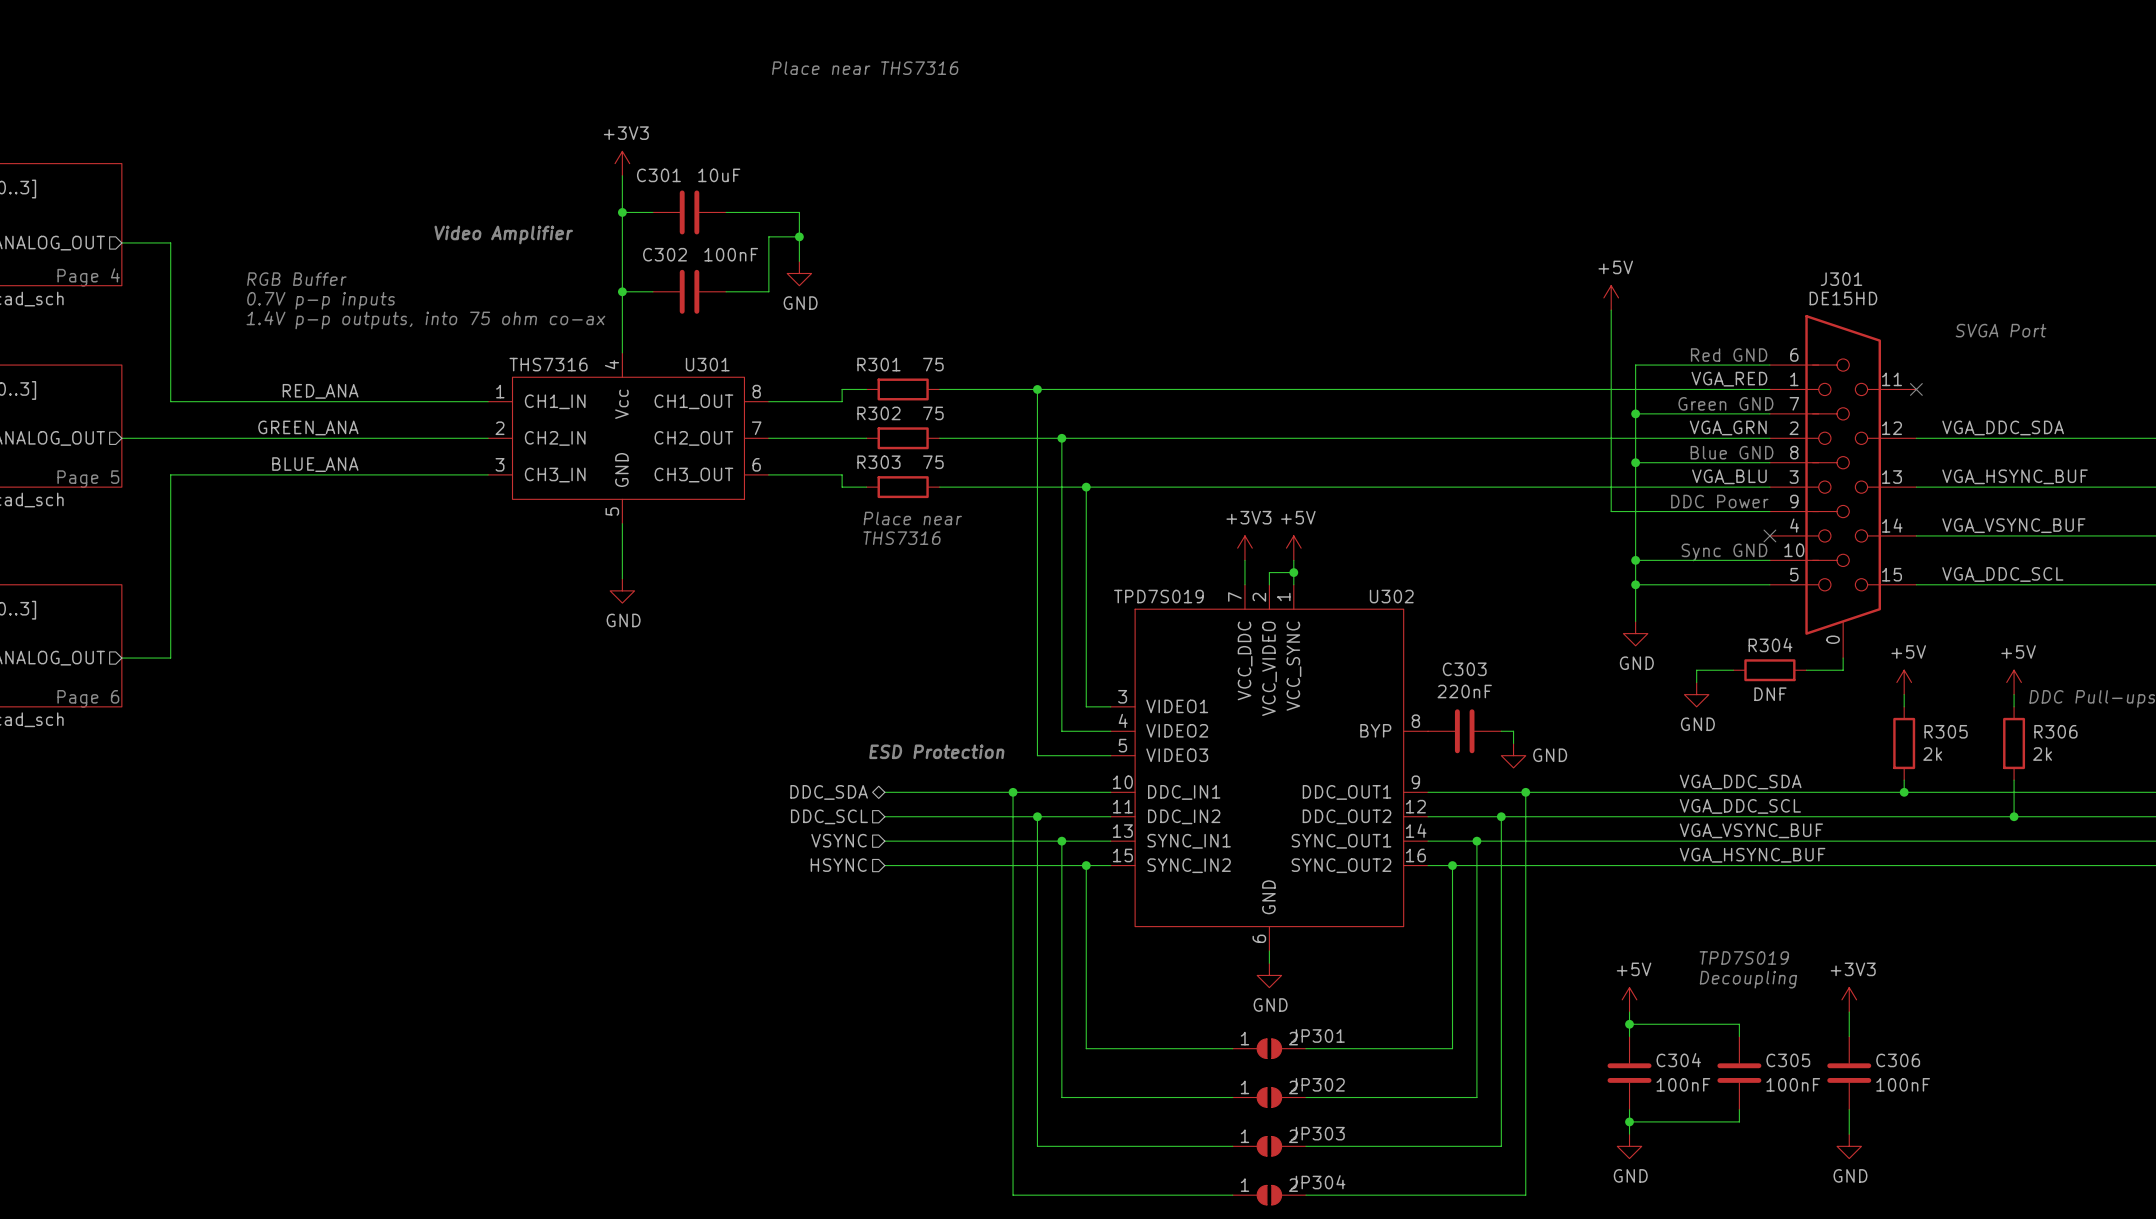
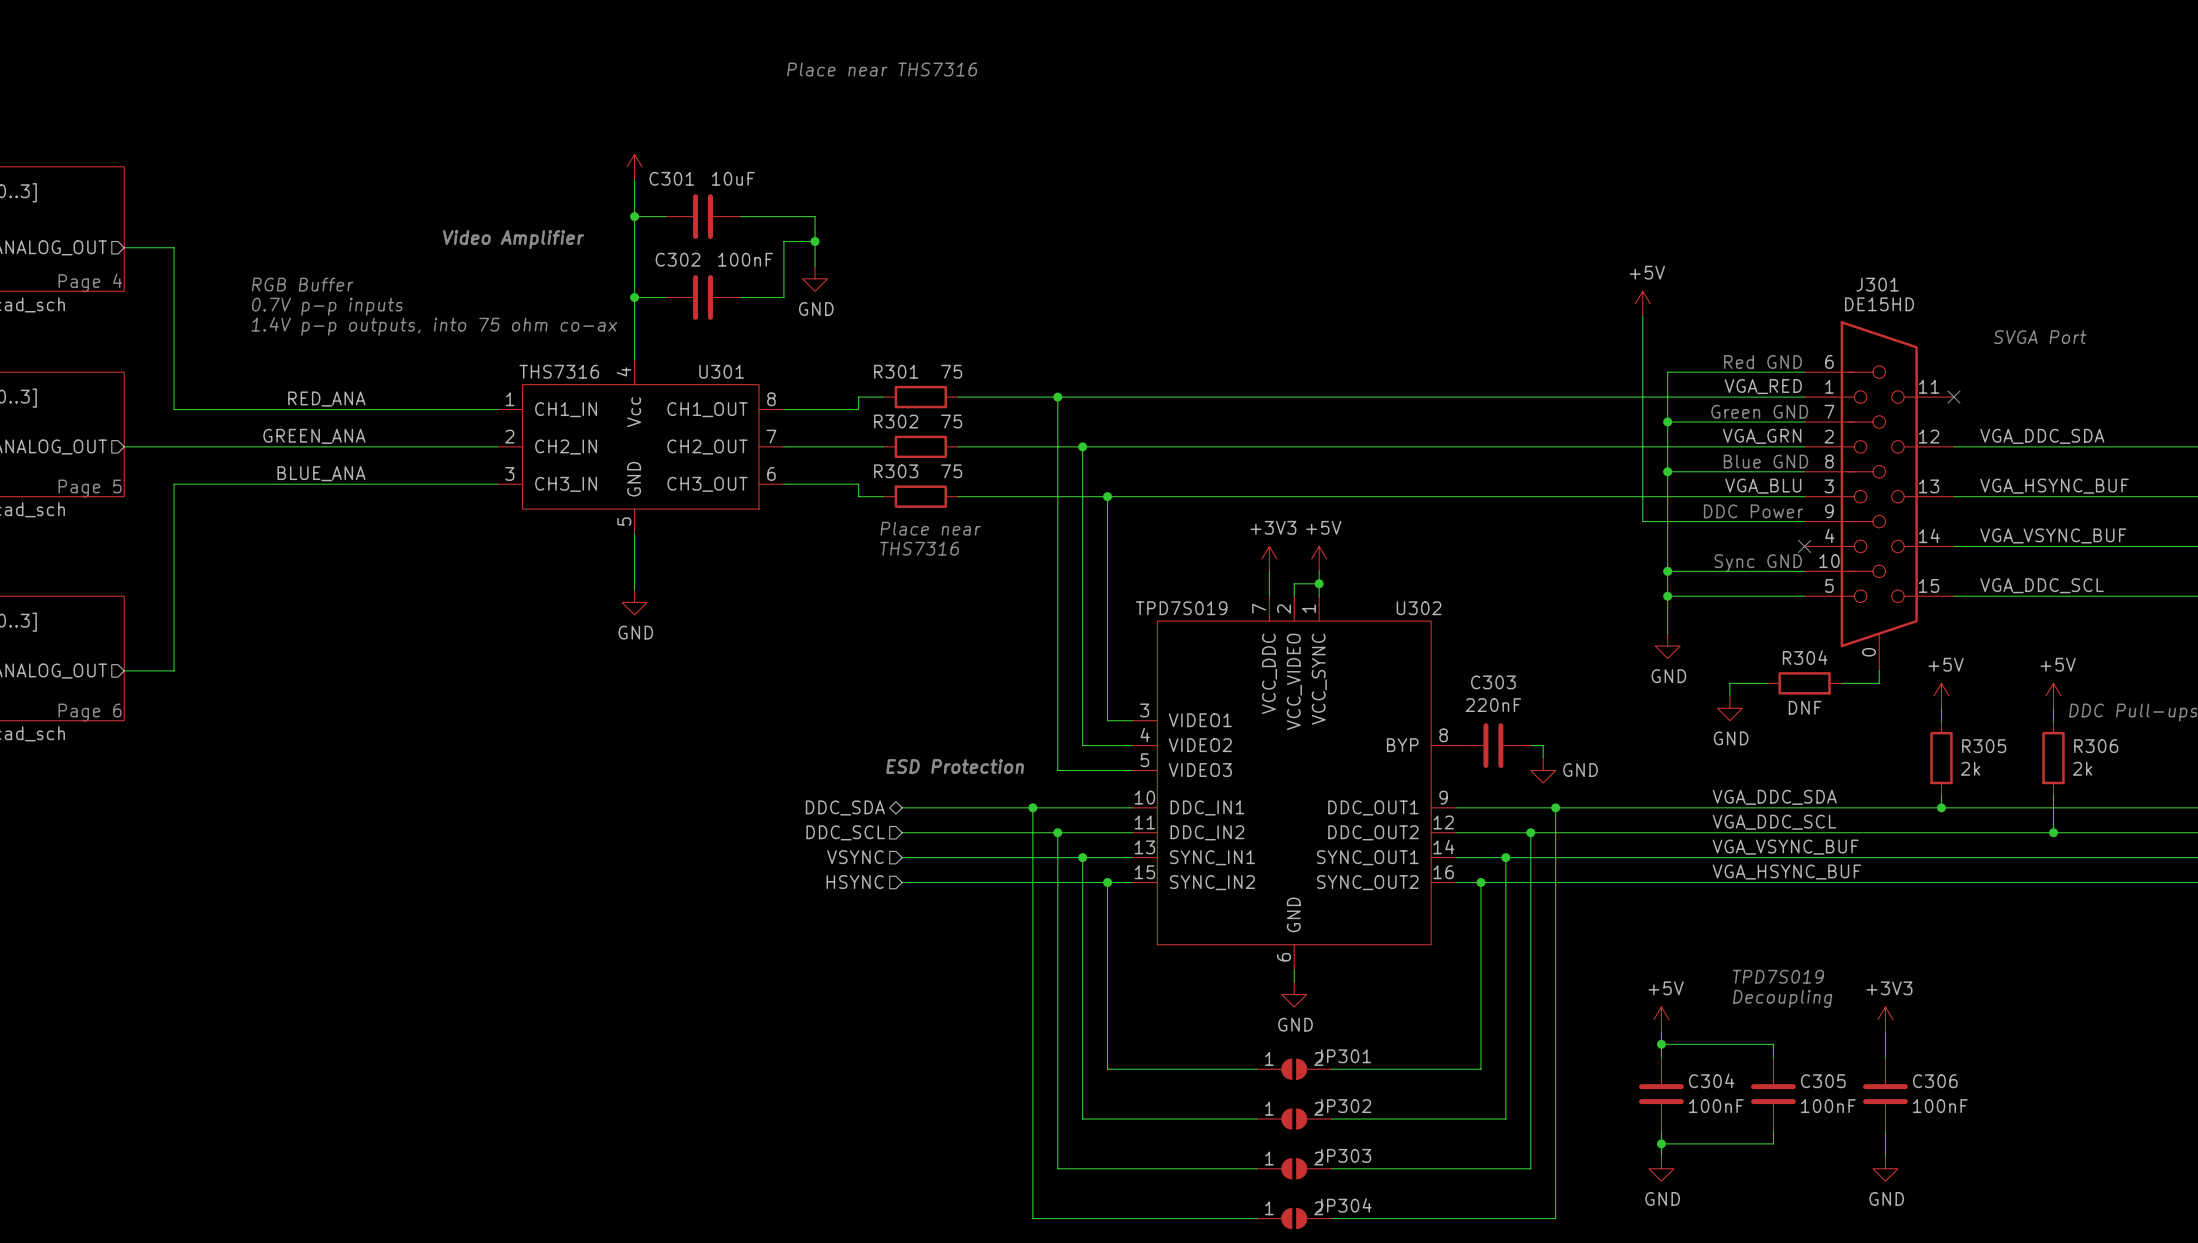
power symbol text: +3V3 (626, 133) -> none

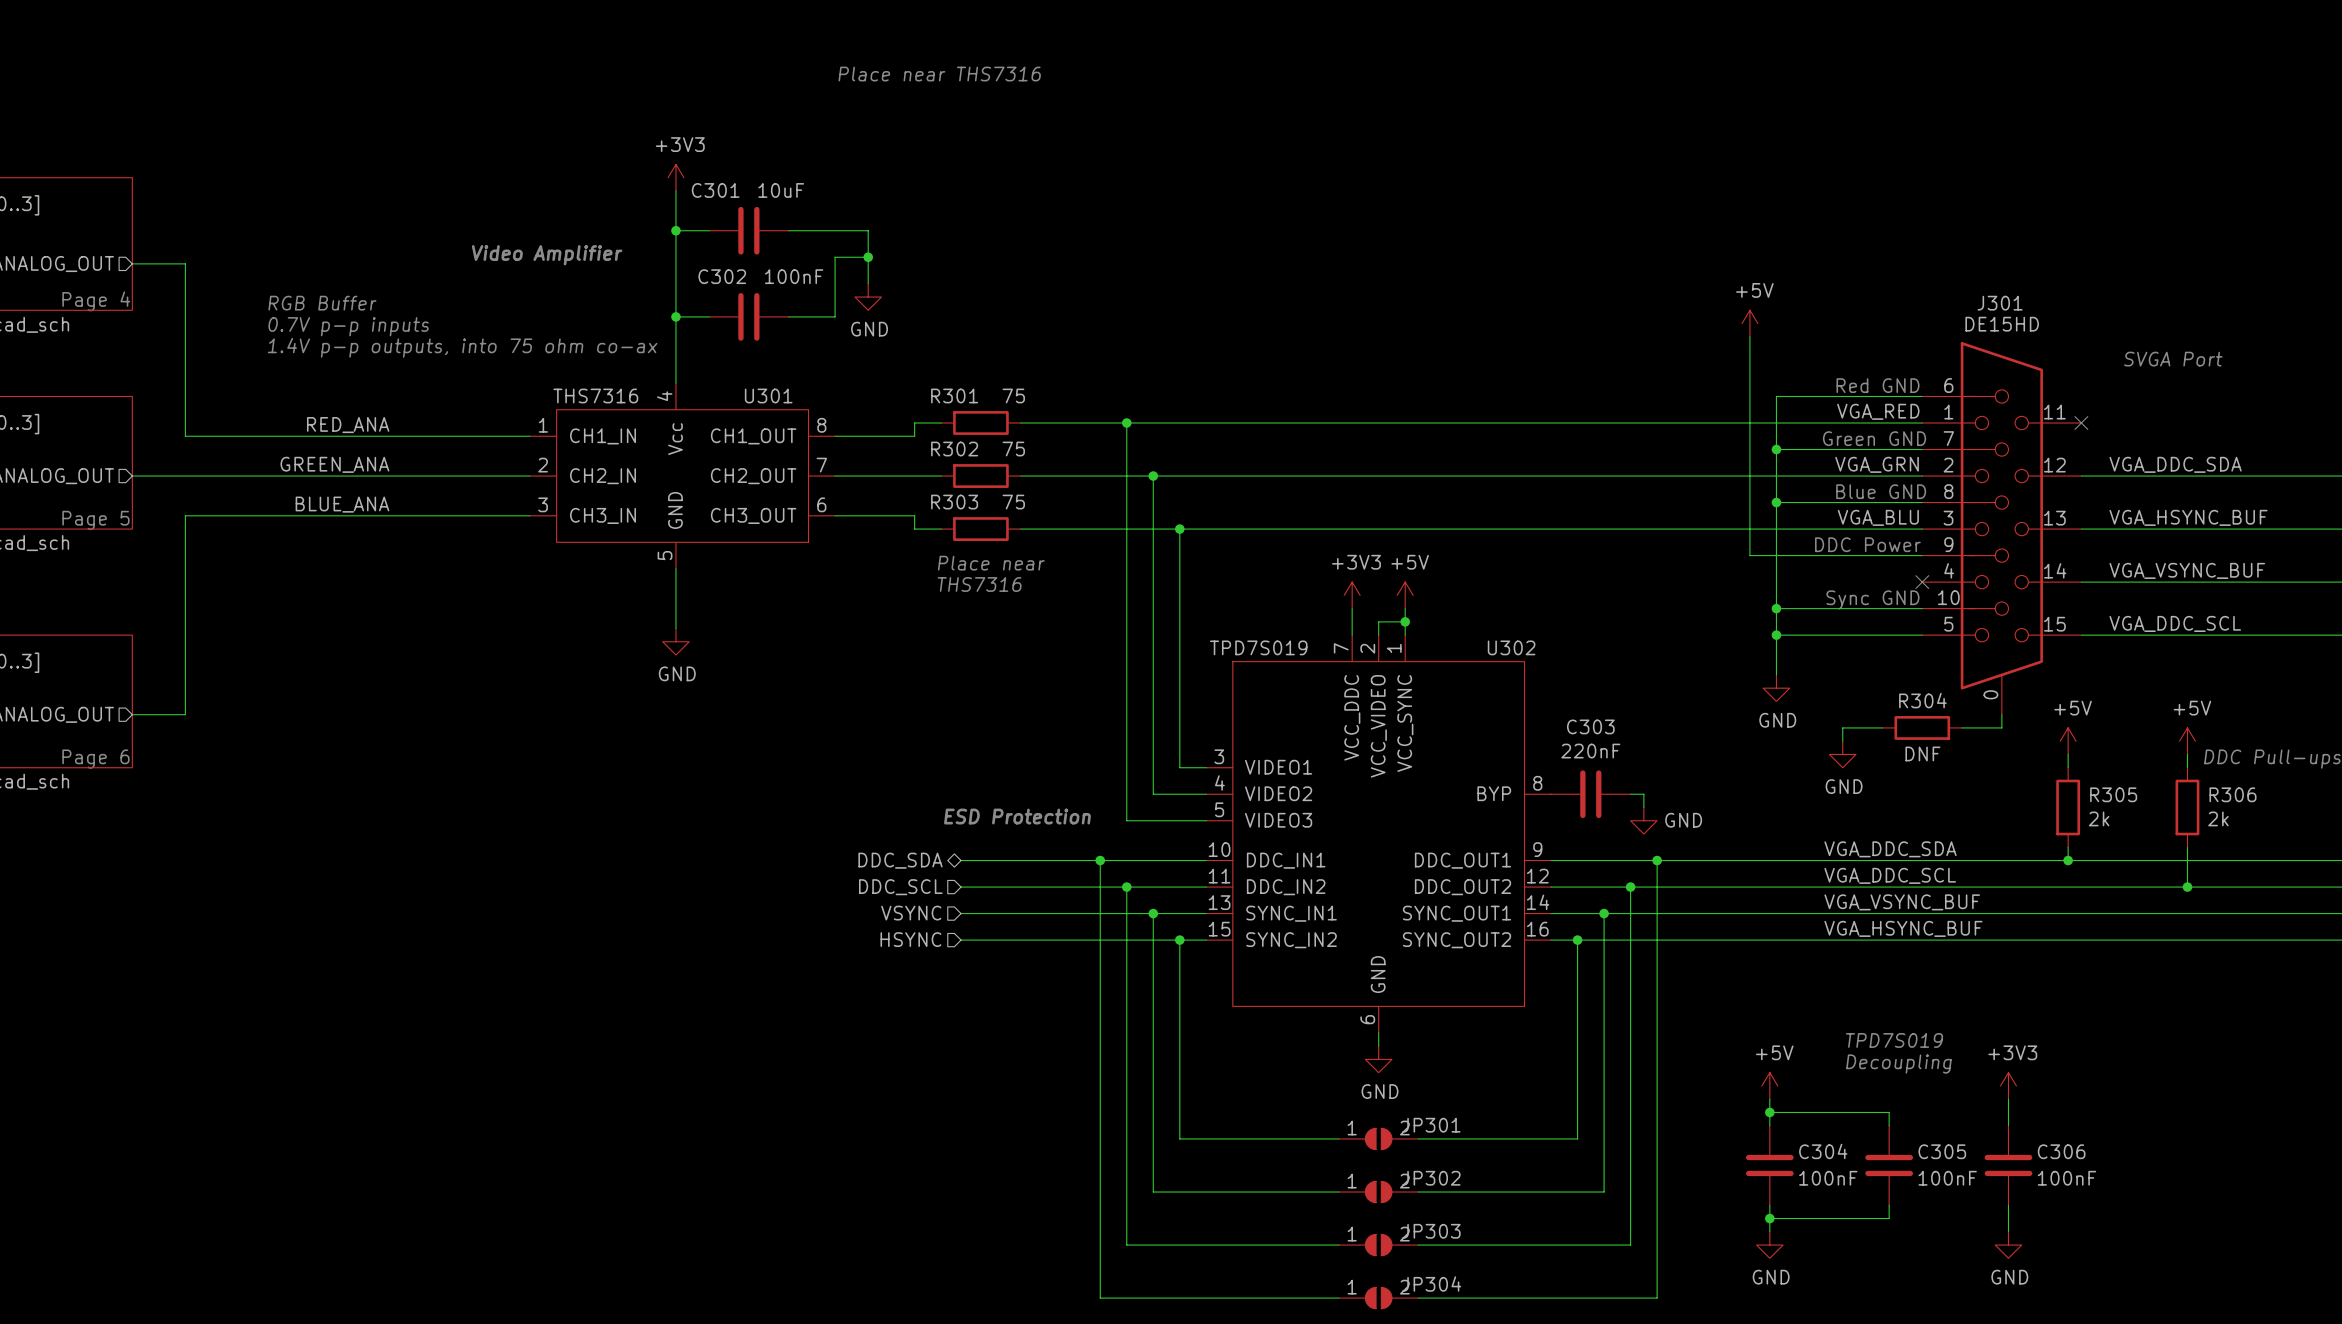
power symbol text: none -> +3V3 (680, 144)

